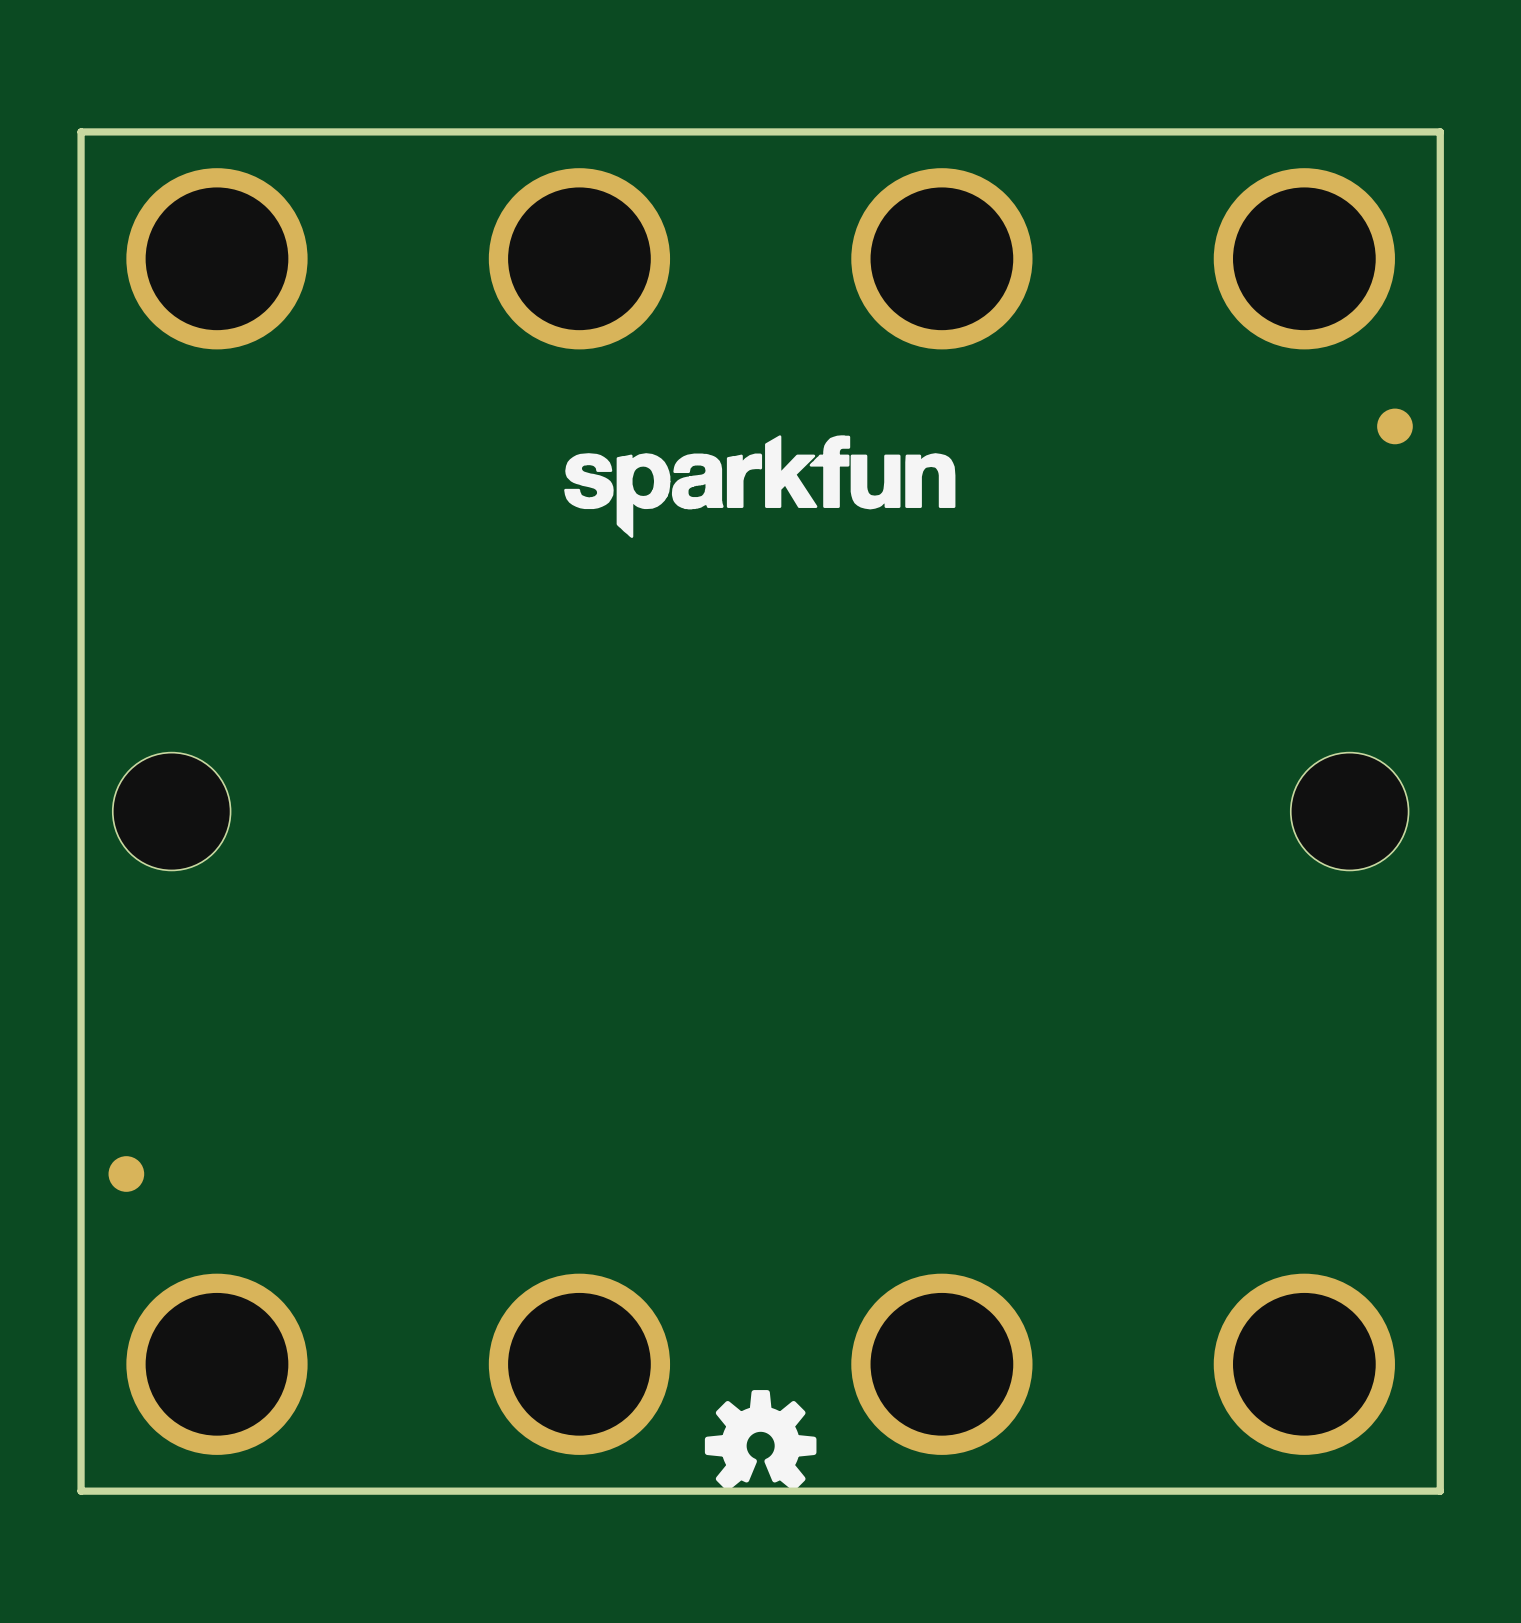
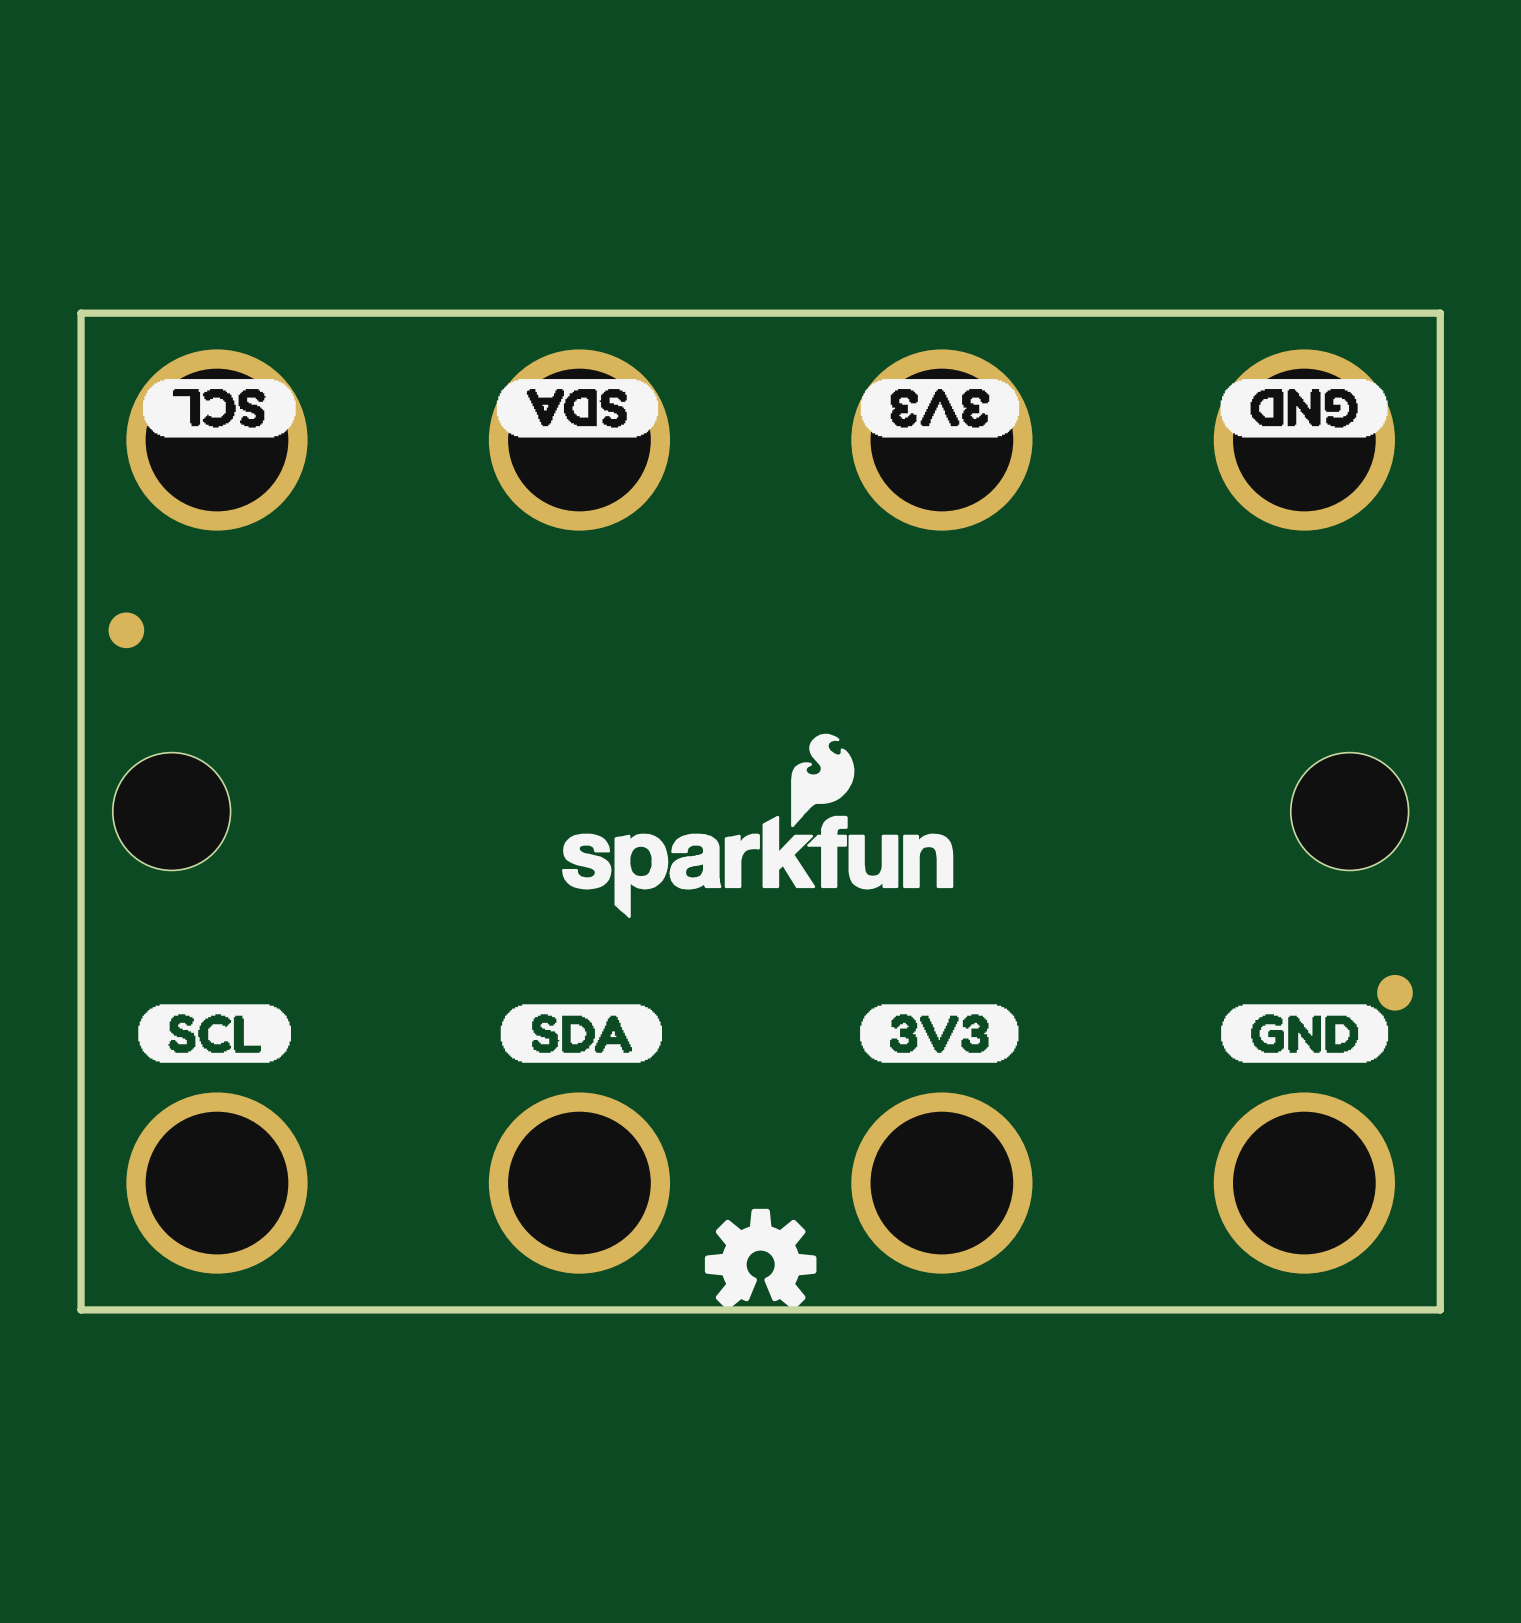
part position: (216, 258) -> (216, 440)
part position: (579, 258) -> (579, 440)
part position: (941, 258) -> (941, 440)
part position: (1304, 258) -> (1304, 440)
board edge: (1440, 313) (1440, 131) (81, 131) (81, 313) -> (1440, 313) (81, 313)
drawing: none -> [142, 379, 296, 438]
drawing: none -> [496, 379, 659, 438]
drawing: none -> [860, 379, 1020, 438]
drawing: none -> [1220, 379, 1388, 438]
part position: (1394, 426) -> (1394, 992)
drawing: [564, 435, 956, 538] -> none
drawing: none -> [562, 733, 954, 919]
drawing: none -> [138, 1004, 291, 1063]
drawing: none -> [500, 1004, 662, 1063]
drawing: none -> [860, 1004, 1019, 1063]
drawing: none -> [1221, 1004, 1389, 1063]
part position: (126, 1174) -> (126, 630)
board edge: (1440, 1309) (1440, 1491) (81, 1491) (81, 1309) -> (1440, 1309) (81, 1309)
part position: (216, 1364) -> (216, 1183)
part position: (579, 1364) -> (579, 1183)
part position: (941, 1364) -> (941, 1183)
part position: (1304, 1364) -> (1304, 1183)
drawing position: (760, 1440) -> (760, 1259)

